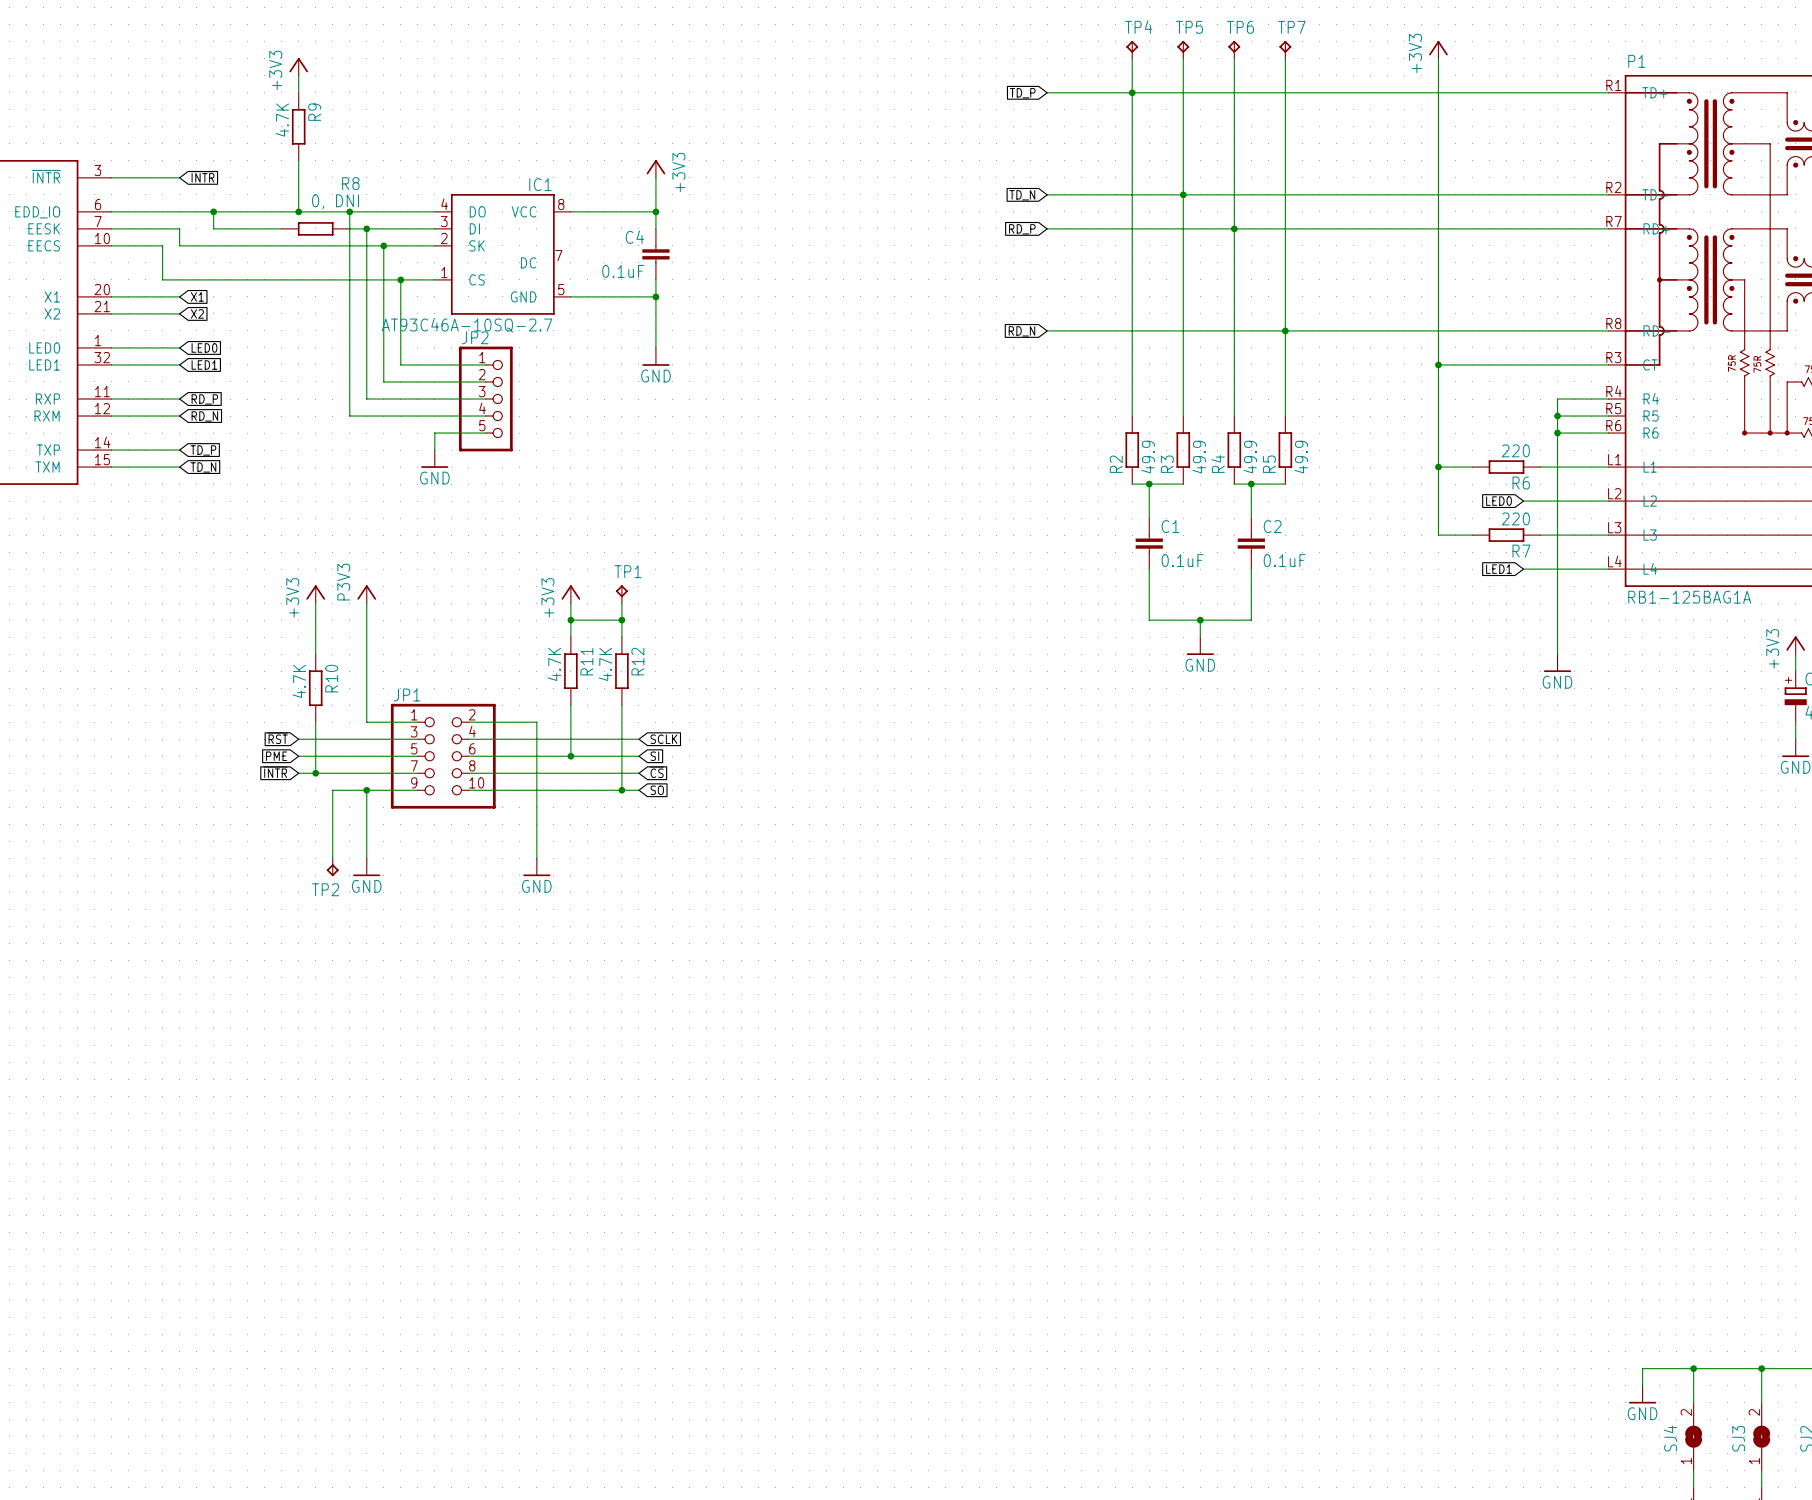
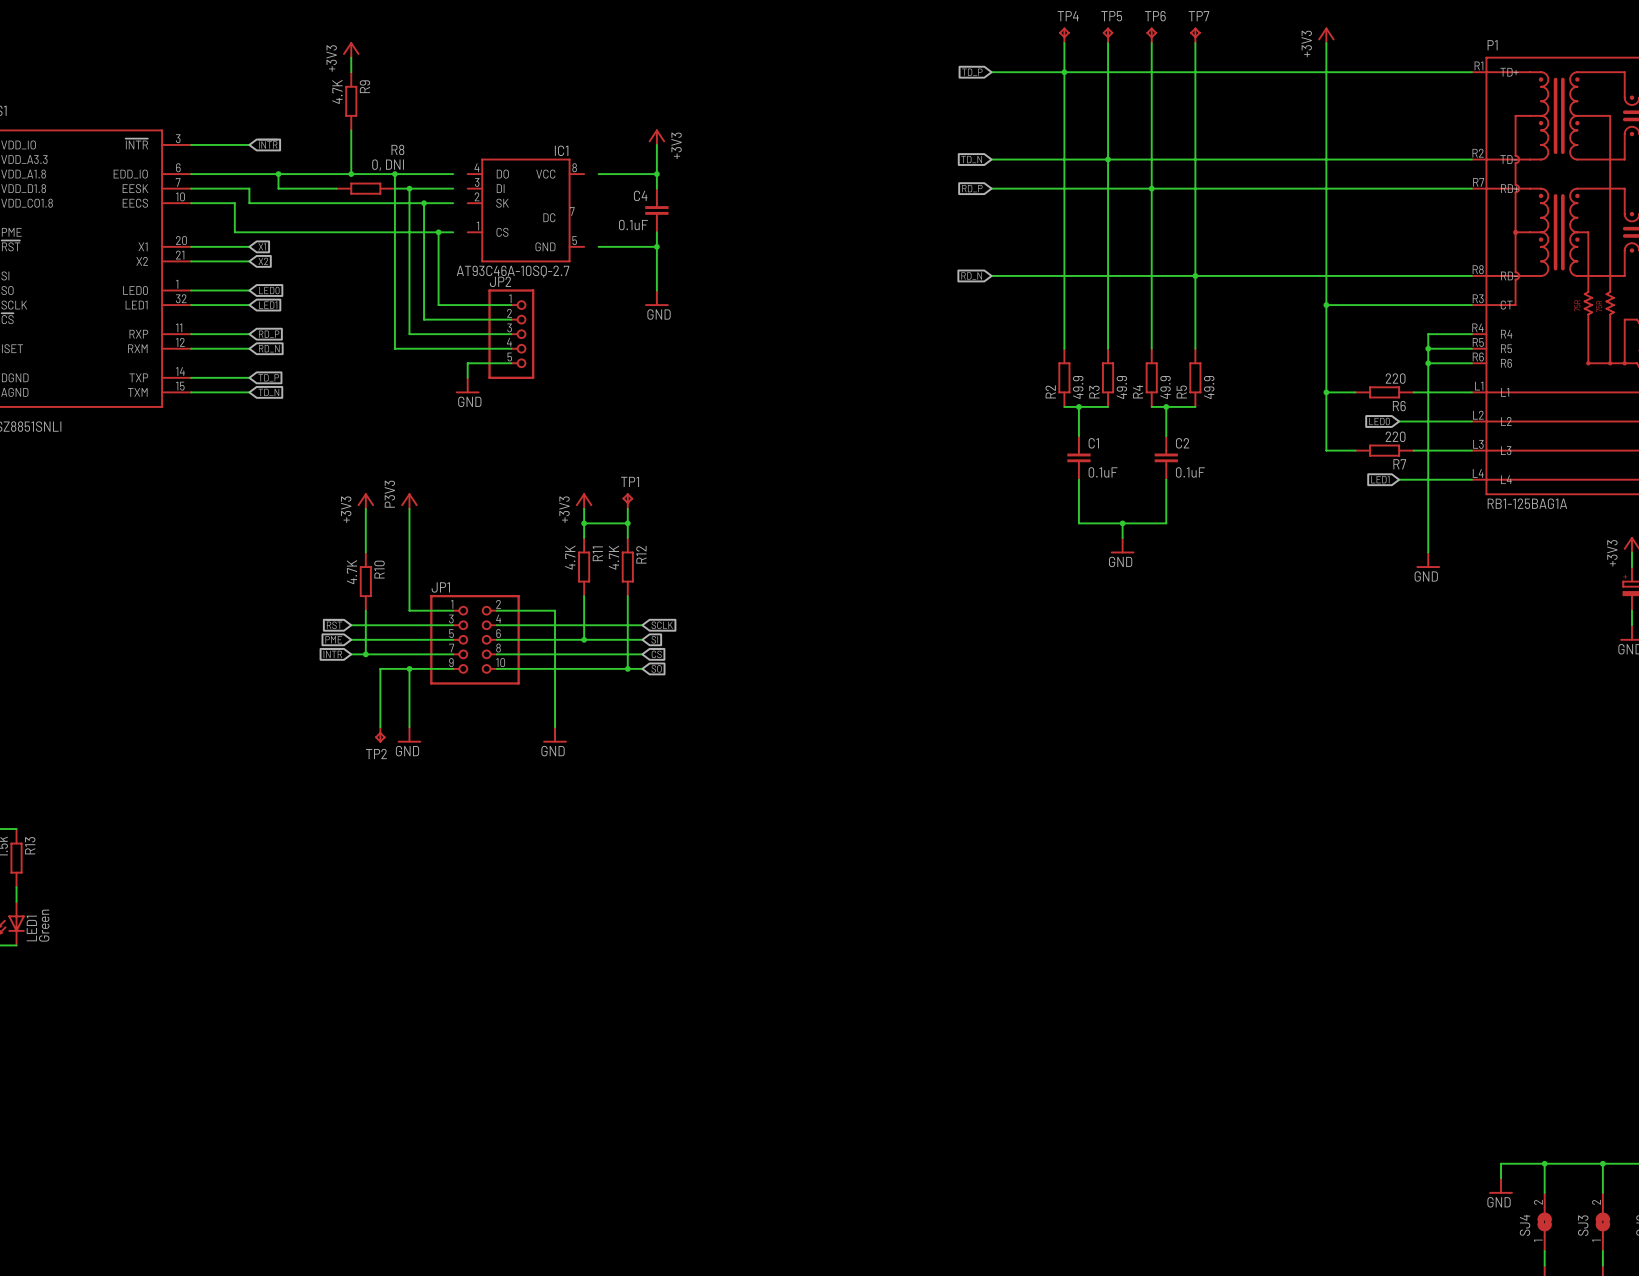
wire: (417, 211) (434, 211) -> none
wire: (570, 211) (587, 211) -> none
wire: (417, 228) (434, 228) -> none
wire: (417, 245) (434, 245) -> none
wire: (417, 279) (434, 279) -> none
wire: (570, 296) (587, 296) -> none

